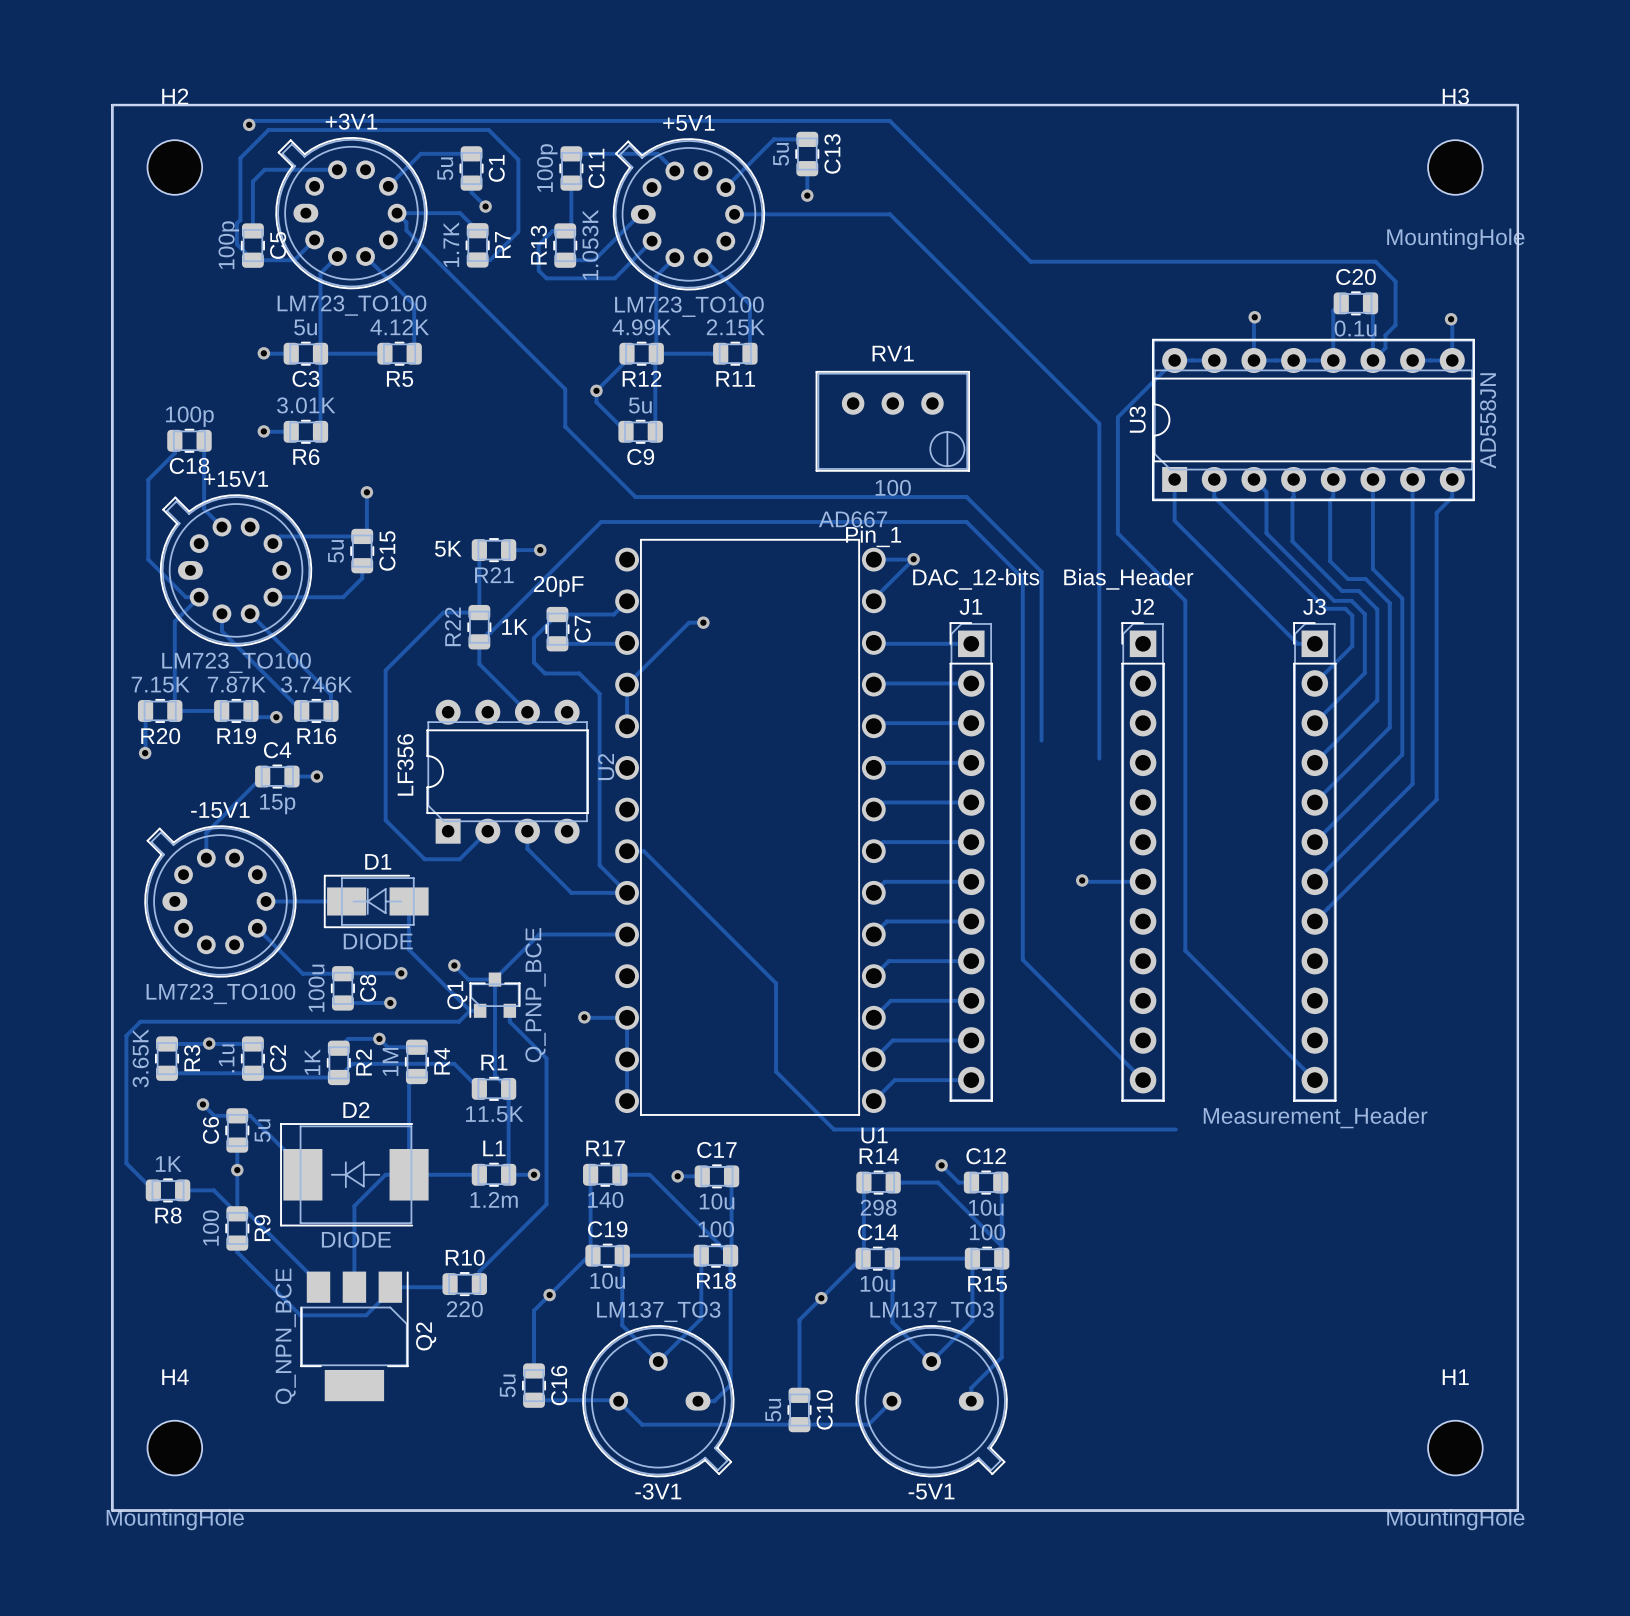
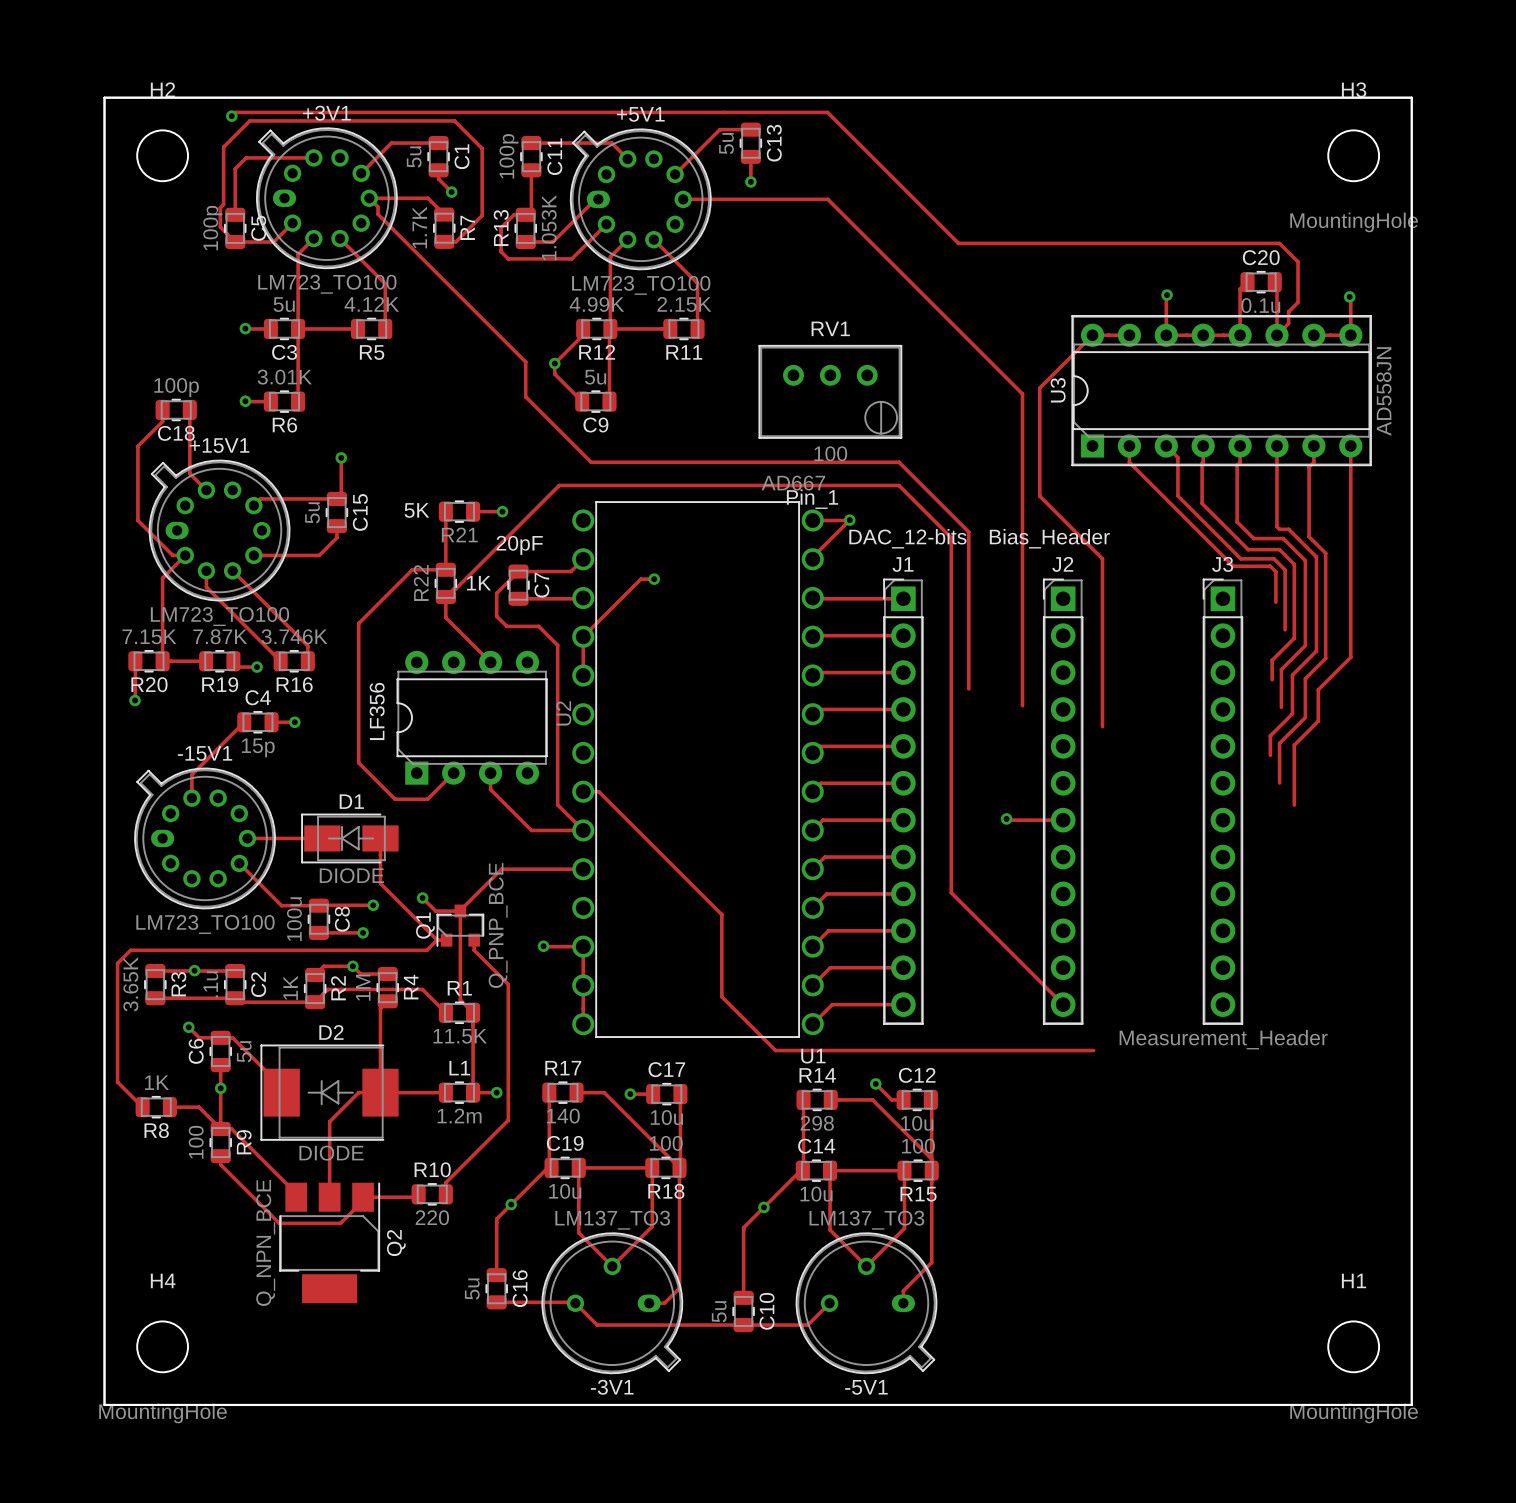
track: (1174, 479) (1174, 520) (1297, 643) (1314, 643) -> none
track: (1412, 497) (1412, 784) (1314, 881) -> (1313, 462) (1309, 467) (1309, 536) (1325, 553) (1325, 658) (1305, 678) (1305, 717) (1279, 743) (1279, 782)
track: (1452, 497) (1436, 512) (1436, 799) (1314, 921) -> (1350, 462) (1350, 657) (1318, 689) (1318, 721) (1294, 745) (1294, 805)
track: (1372, 566) (1372, 569) (1402, 598) (1402, 754) (1314, 842) -> (1276, 526) (1279, 529) (1288, 529) (1316, 557) (1316, 651) (1292, 675) (1292, 713) (1270, 735) (1270, 755)
track: (1365, 579) (1389, 603) (1389, 727) (1314, 802) -> (1270, 538) (1283, 538) (1305, 560) (1305, 645) (1281, 669) (1281, 707)
track: (1358, 590) (1377, 609) (1377, 700) (1314, 762) -> (1263, 549) (1279, 549) (1294, 564) (1294, 638) (1272, 660) (1272, 679)
track: (1351, 600) (1364, 614) (1364, 673) (1314, 723) -> (1257, 558) (1274, 558) (1285, 569) (1285, 629)
track: (1345, 608) (1352, 615) (1352, 645) (1314, 683) -> (1251, 566) (1270, 566) (1275, 571) (1275, 602)
track: (1185, 781) (1185, 950) (1314, 1080) -> none

